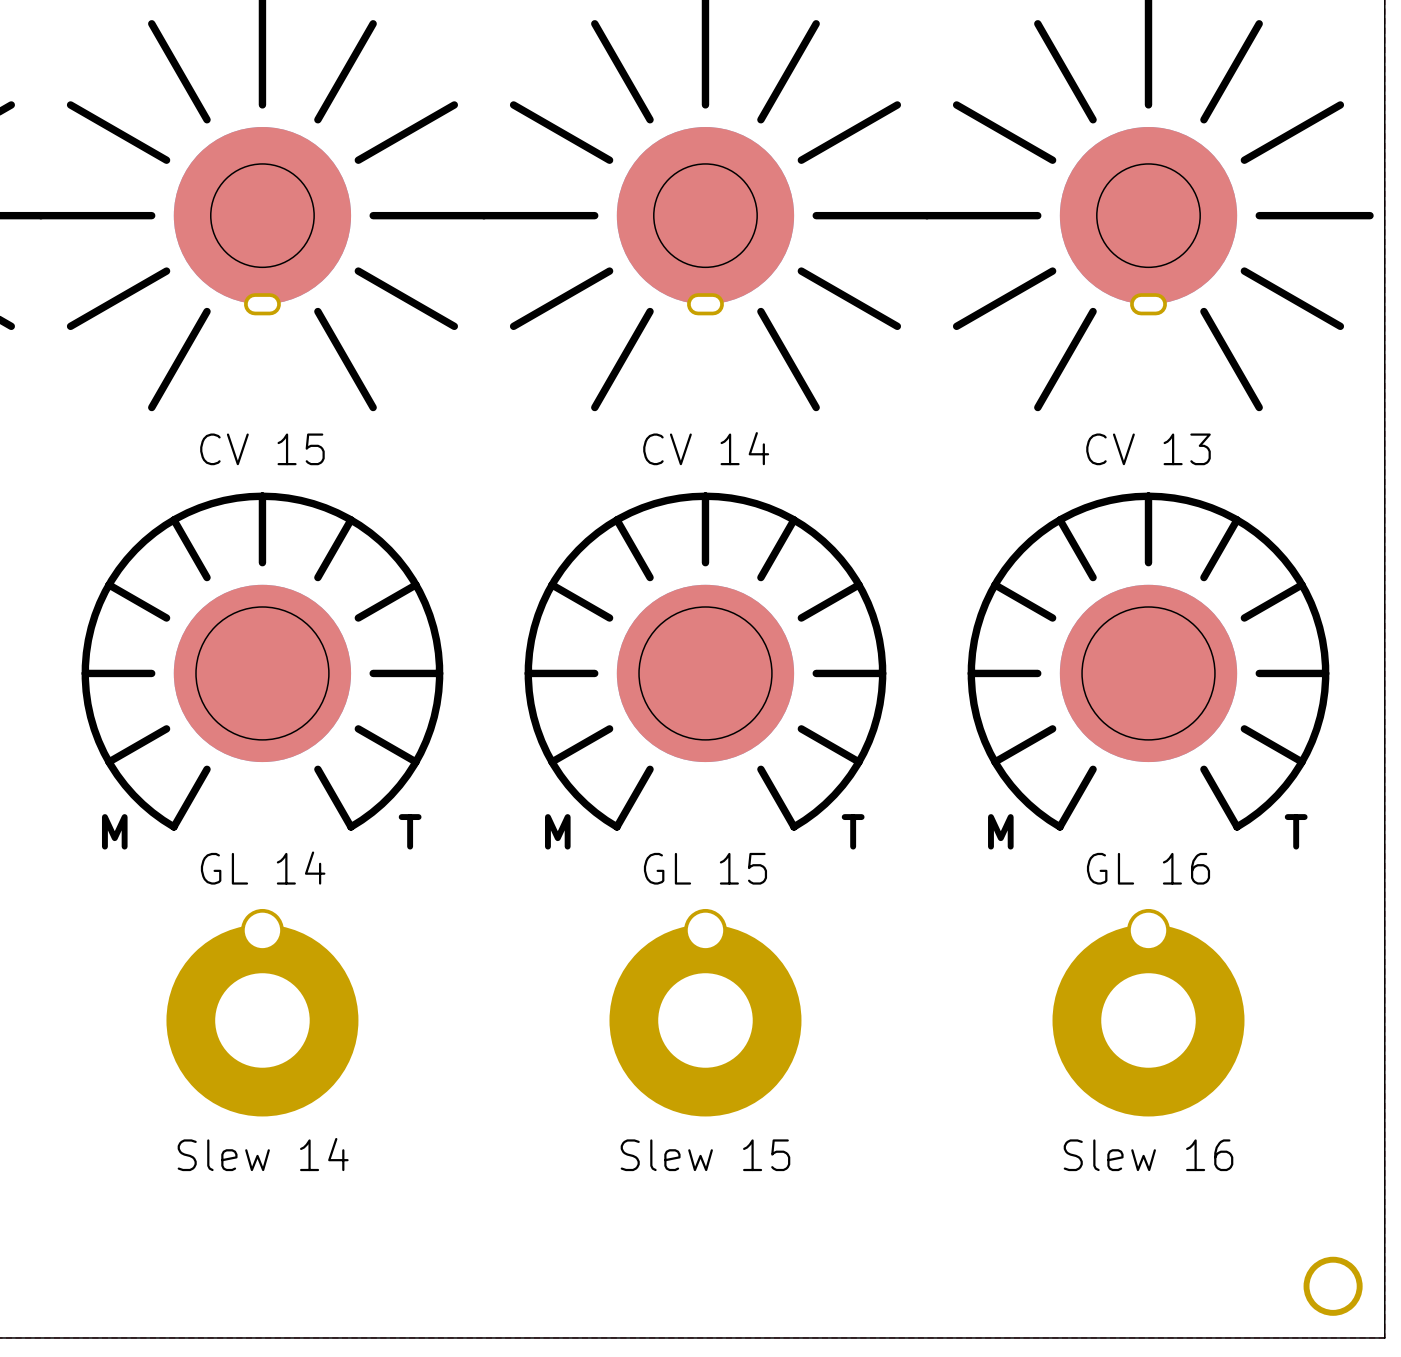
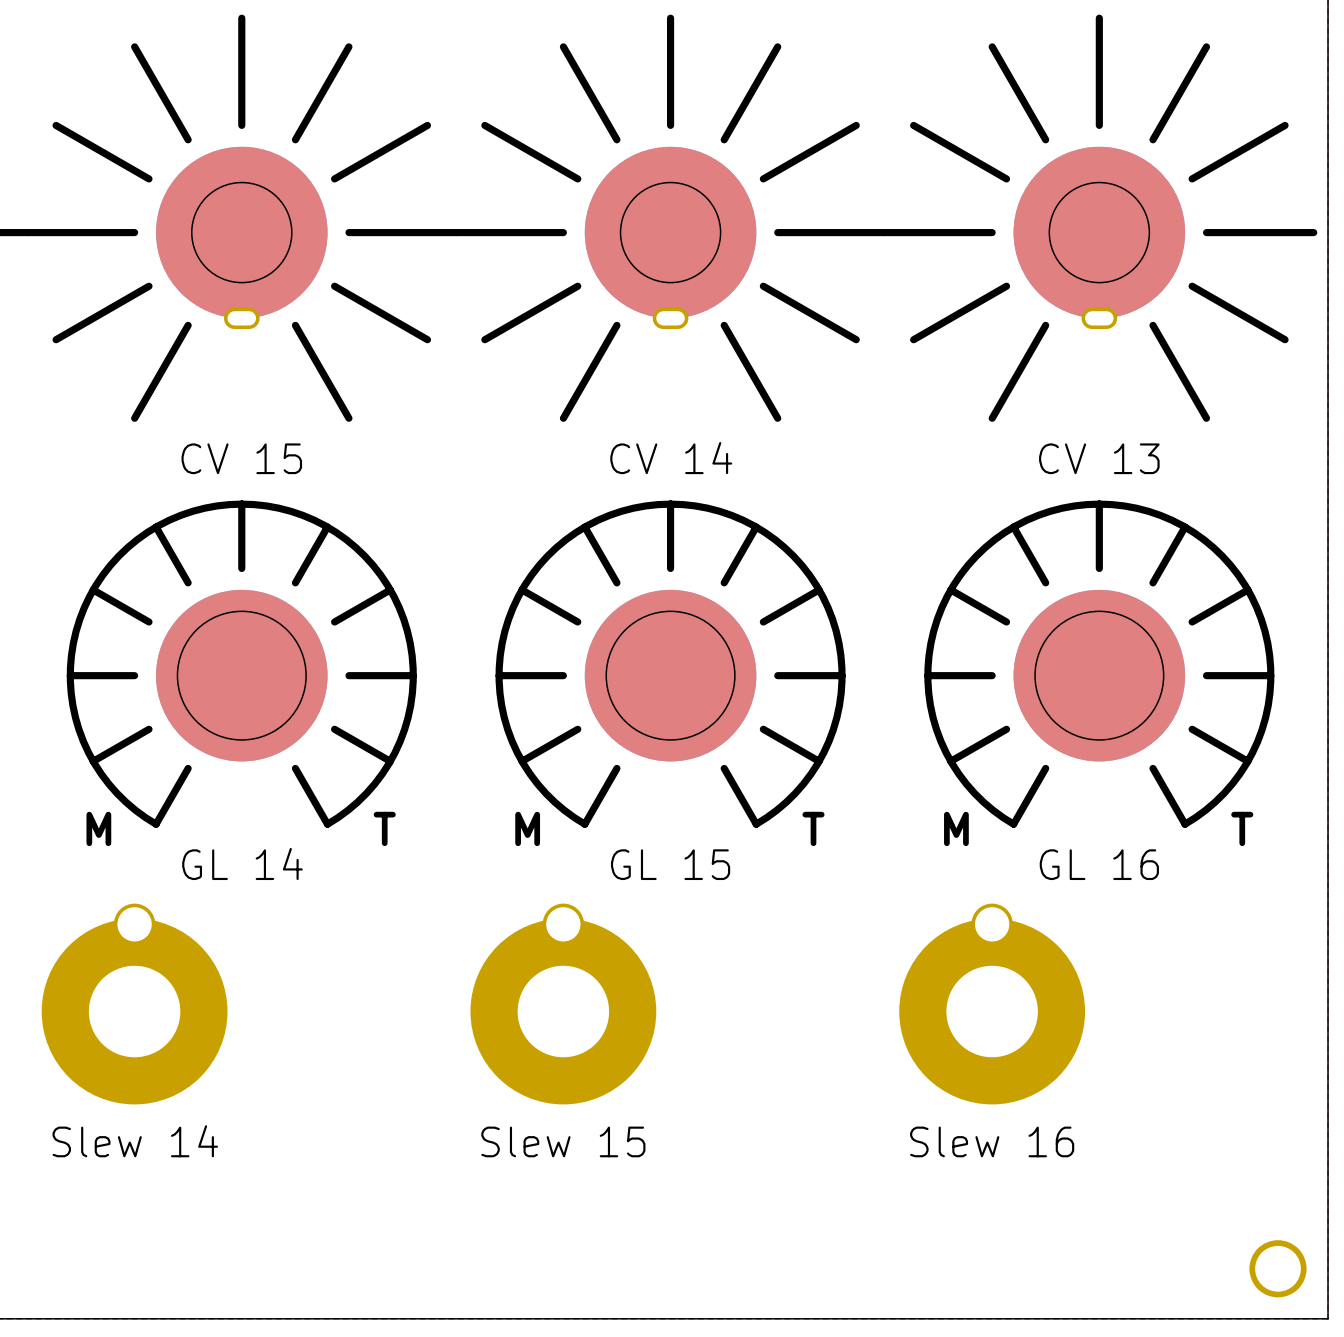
part position: (262, 1012) -> (134, 1004)
part position: (705, 1012) -> (563, 1004)
part position: (1148, 1012) -> (992, 1004)

